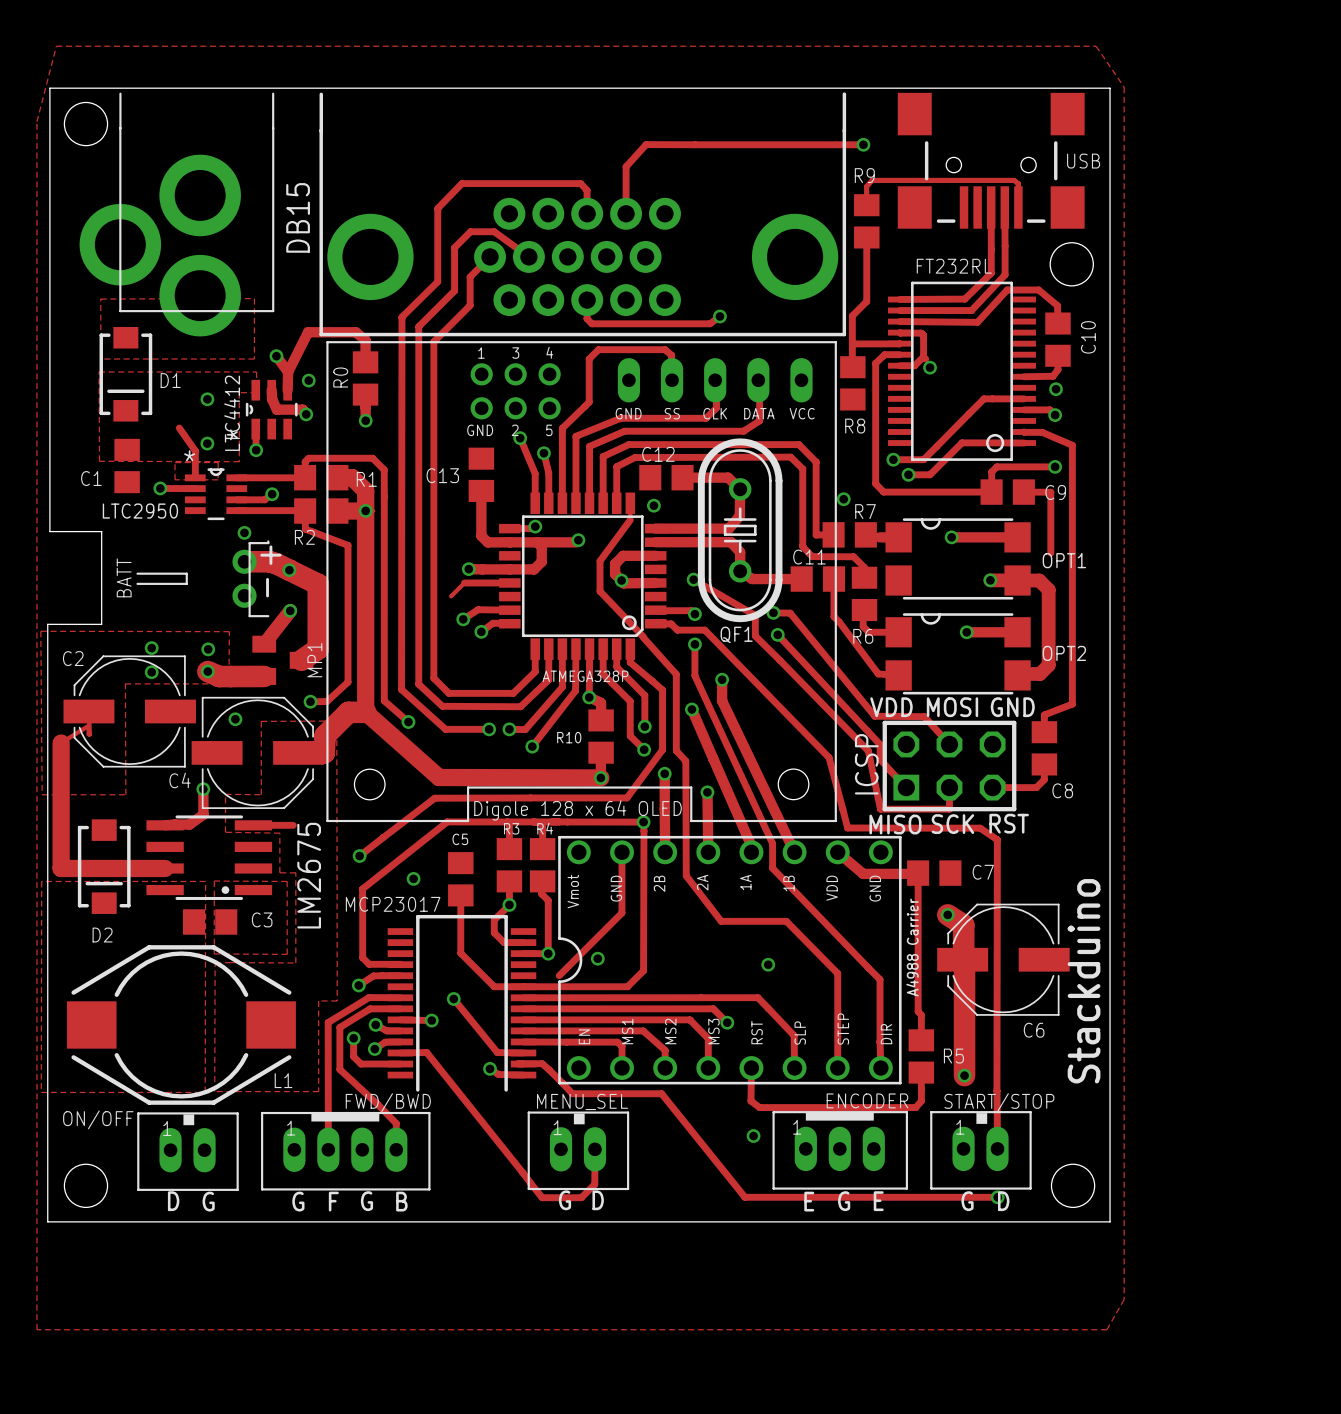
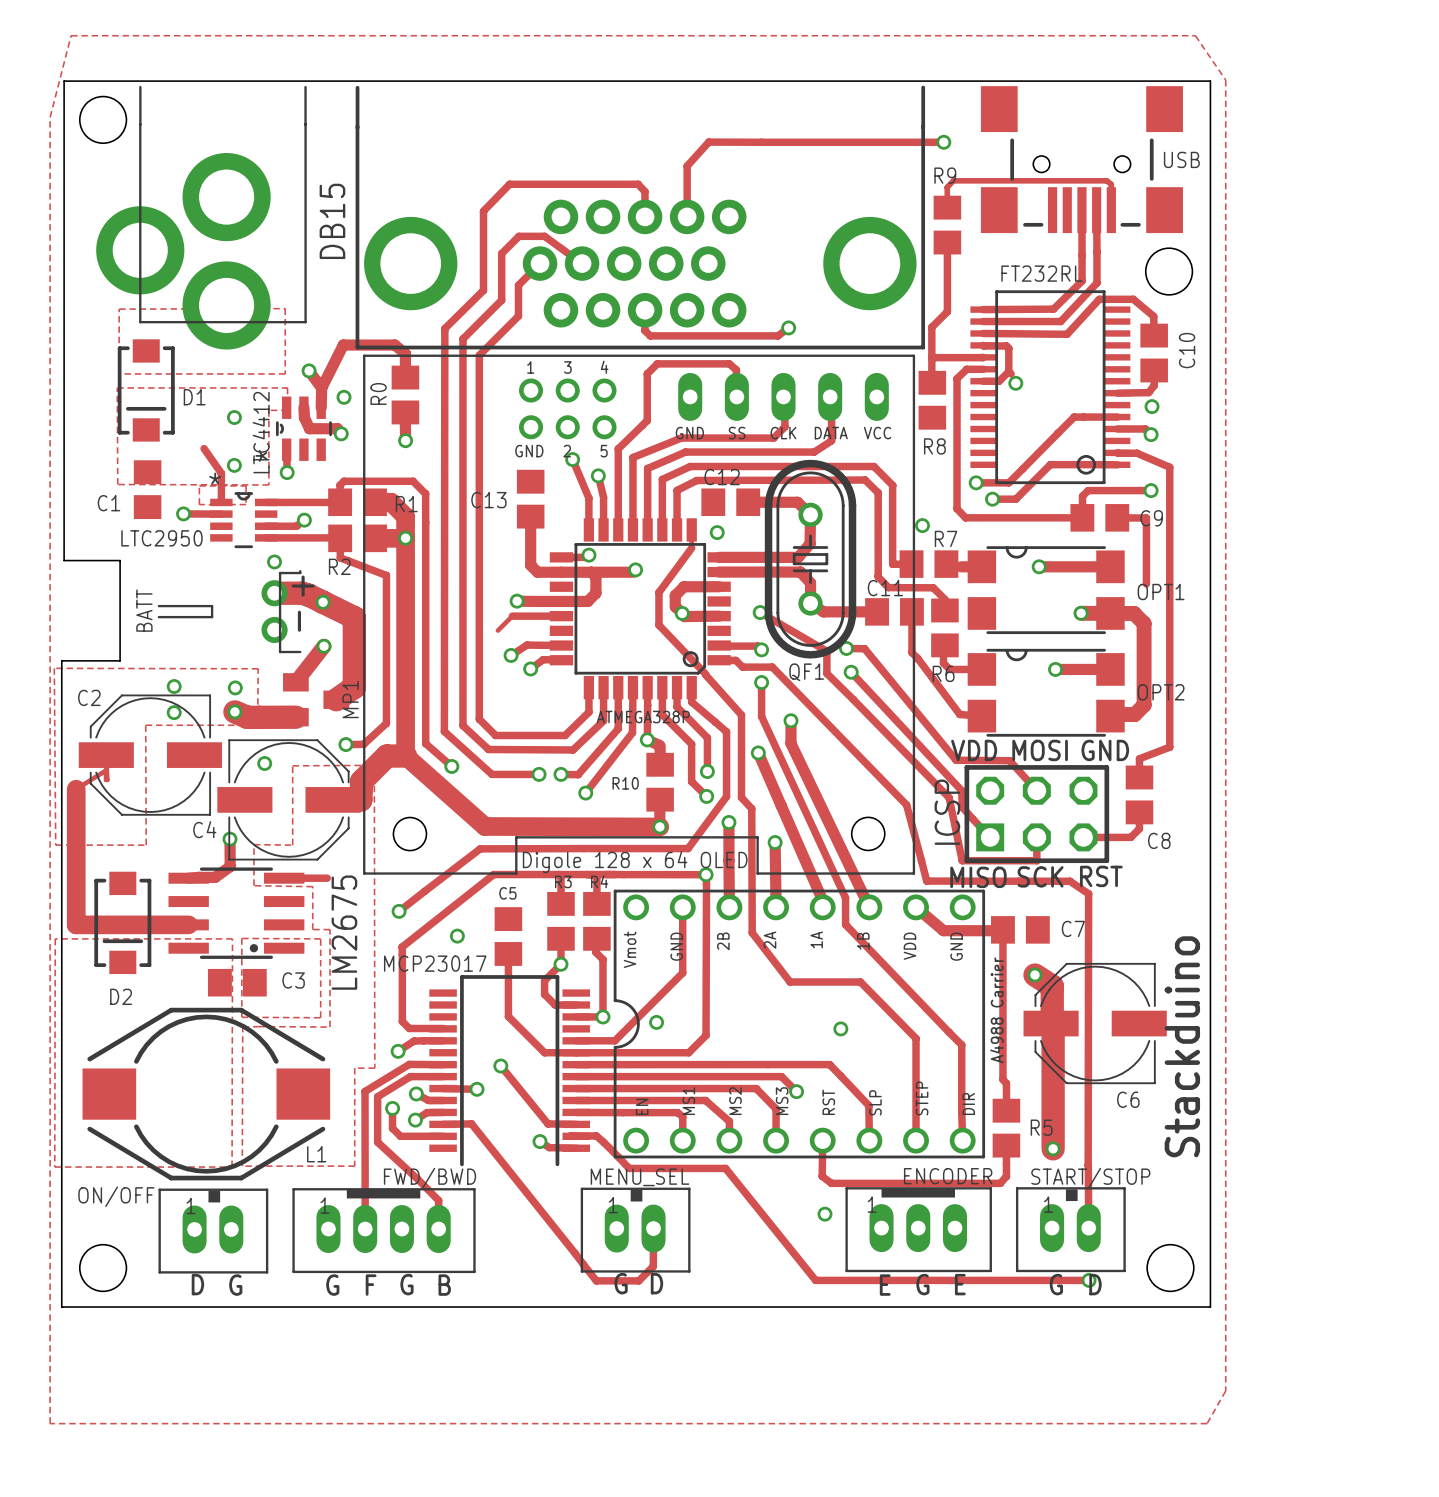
track: none -> (576, 1040) (614, 1040)

